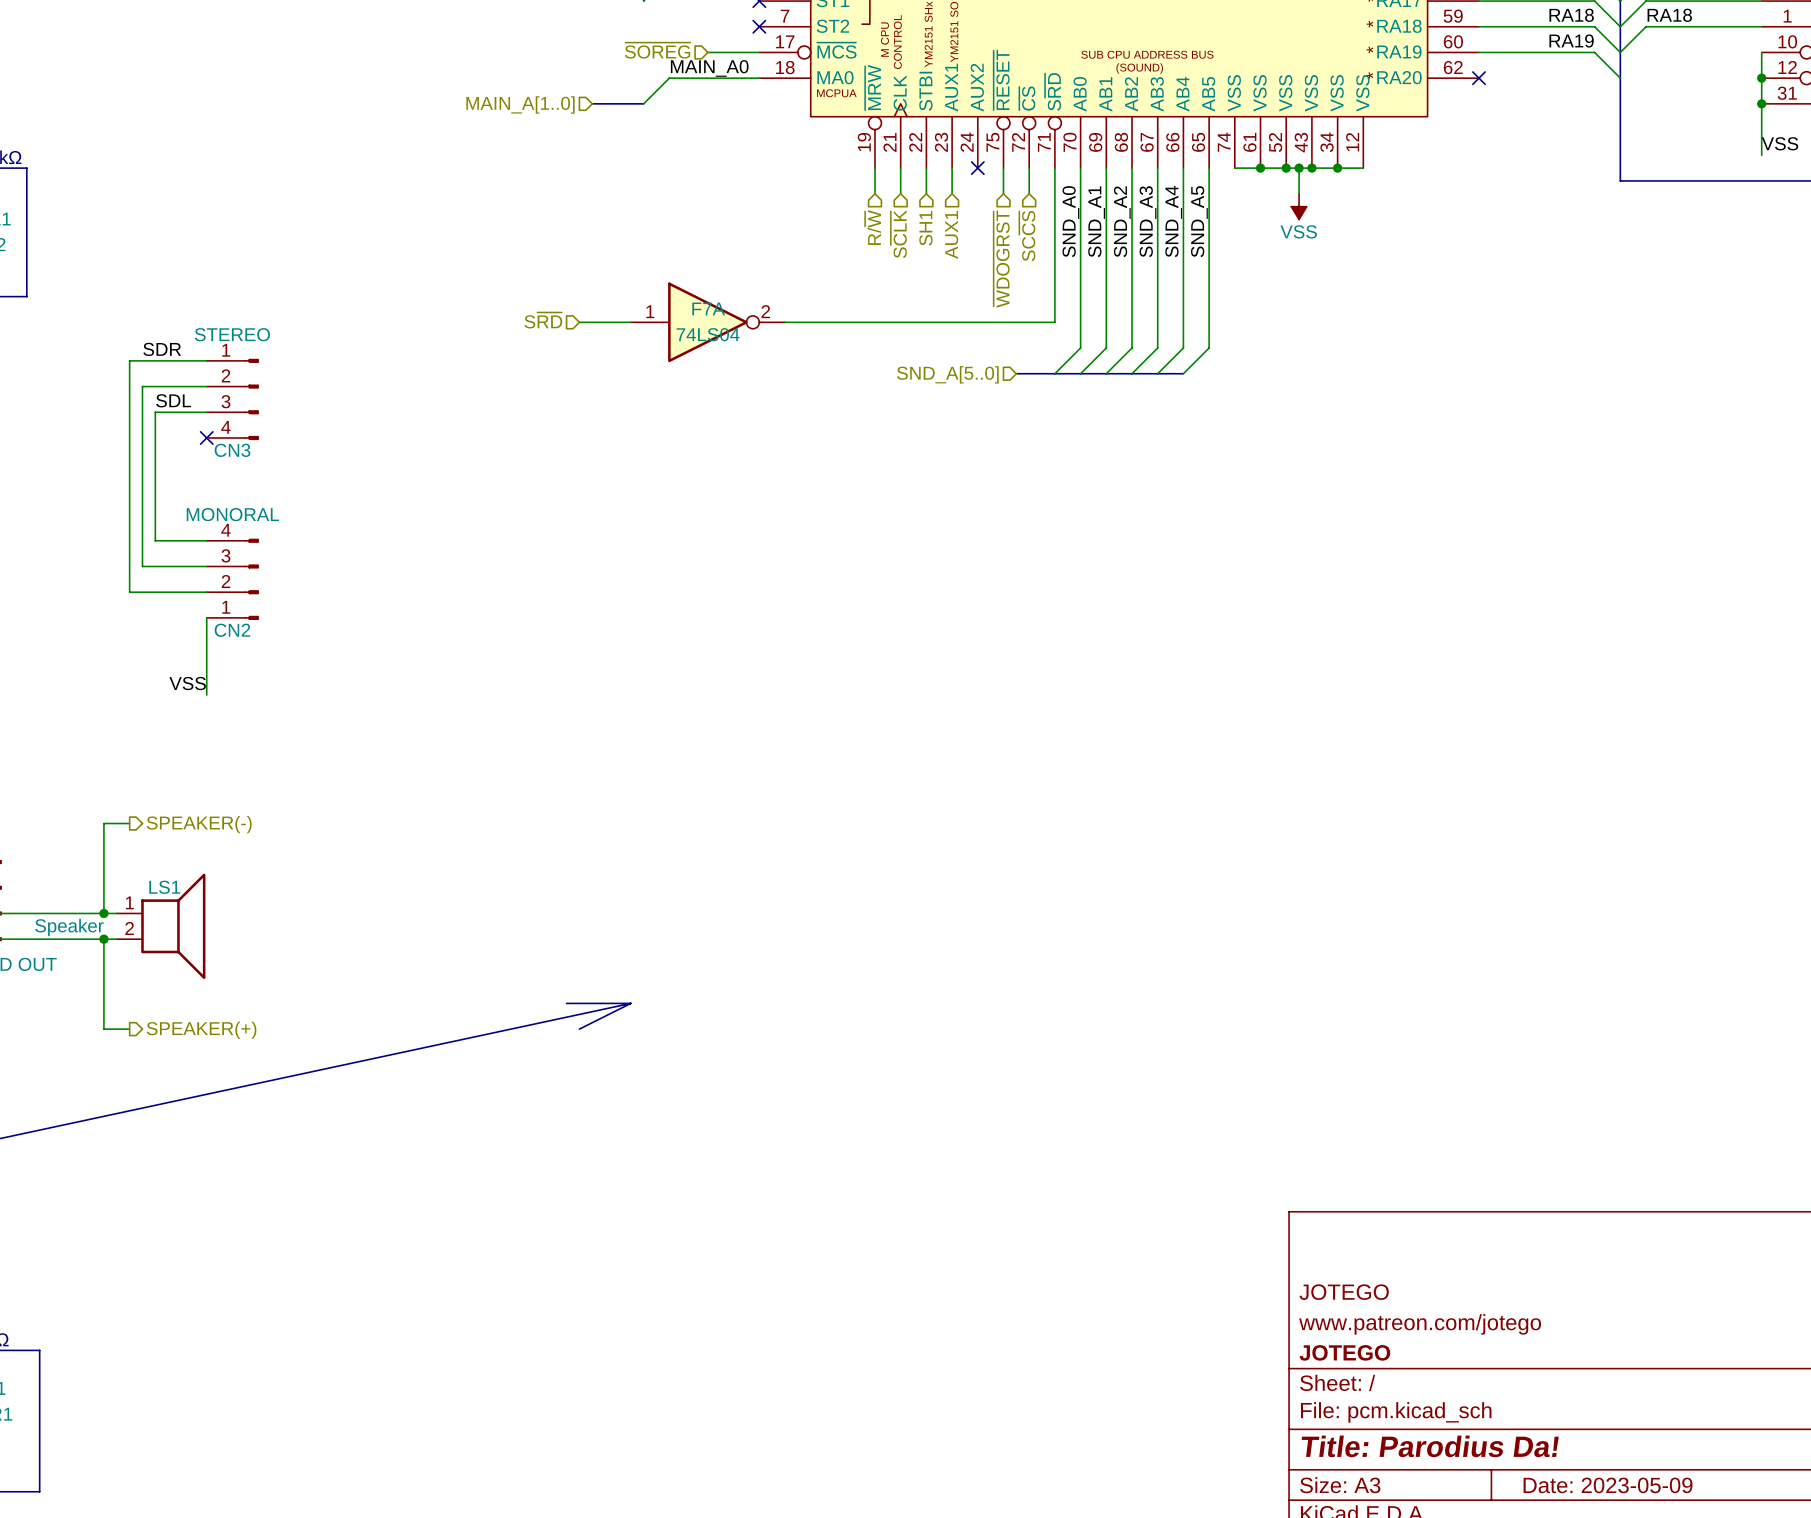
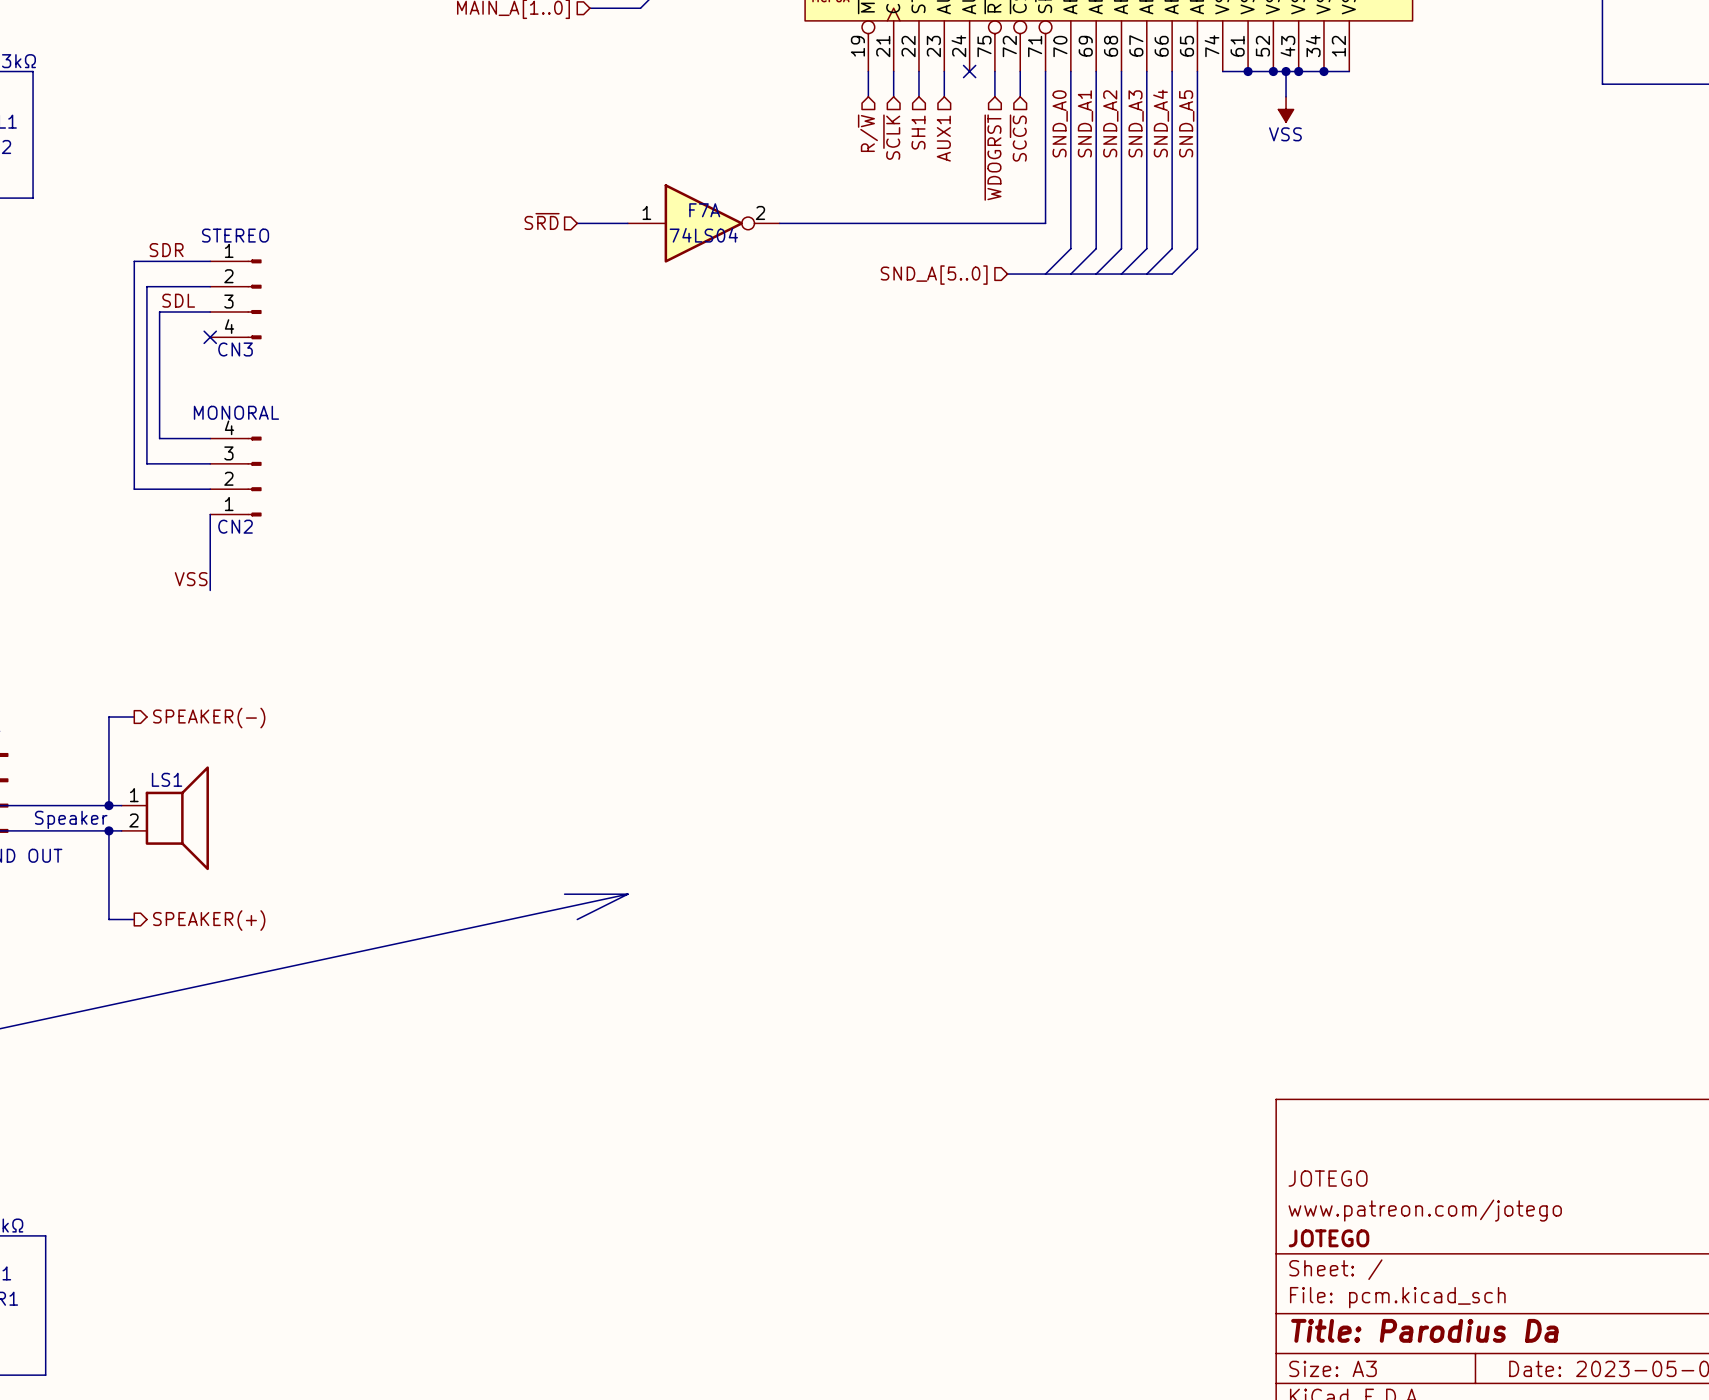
title block: Title: Parodius Da! (1430, 1446) -> Title: Parodius Da (1424, 1330)

